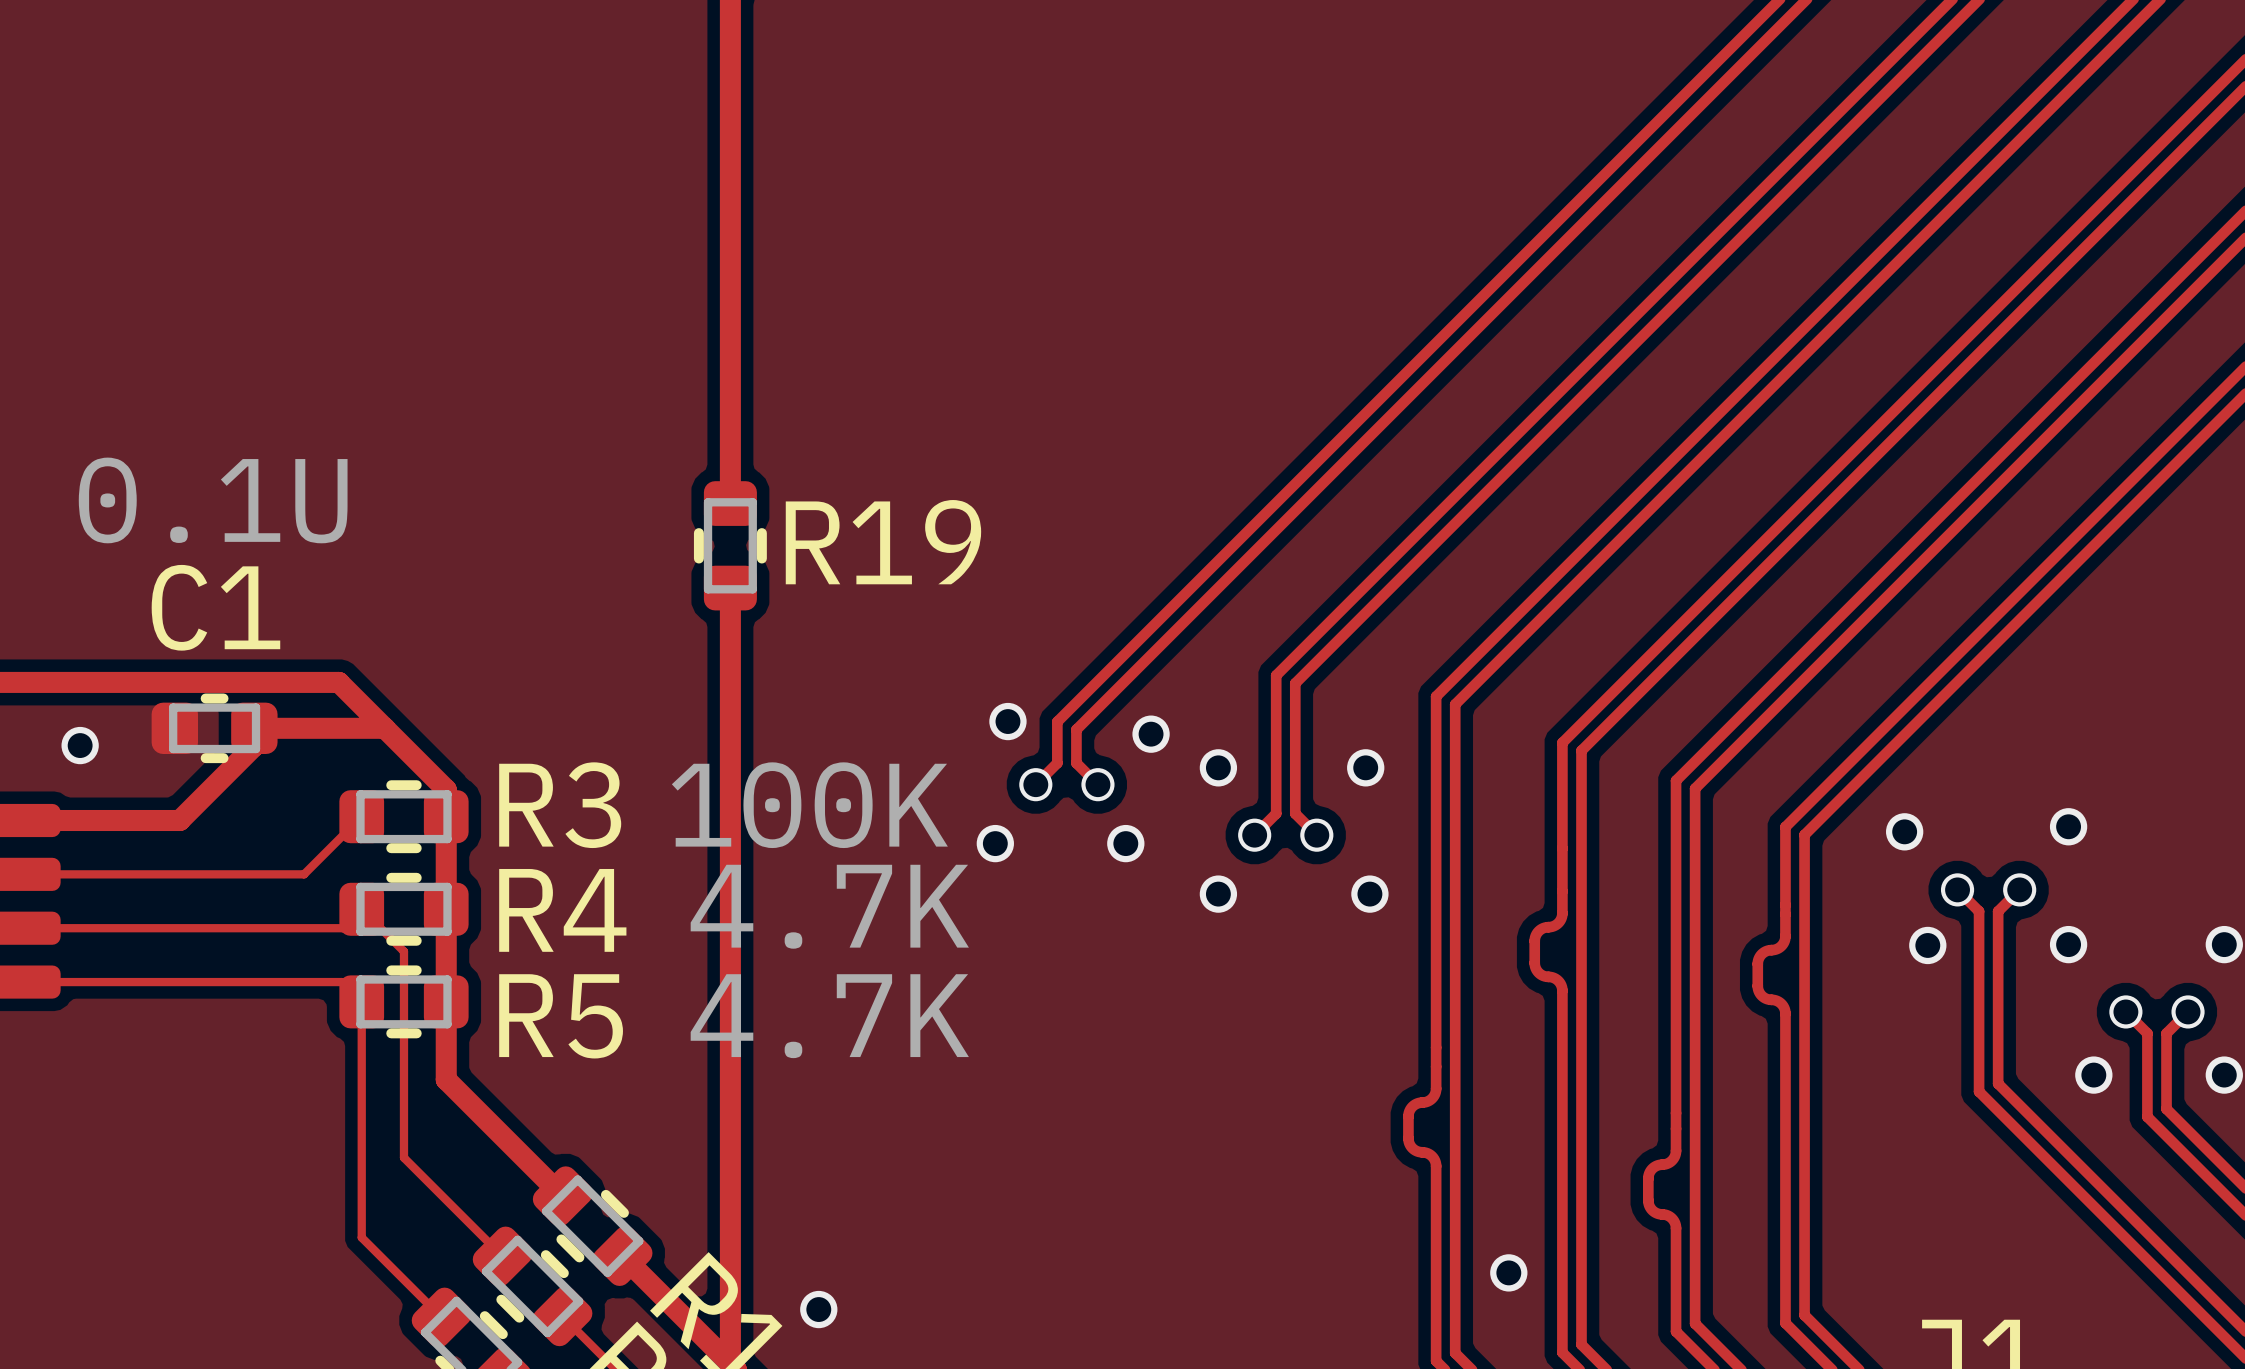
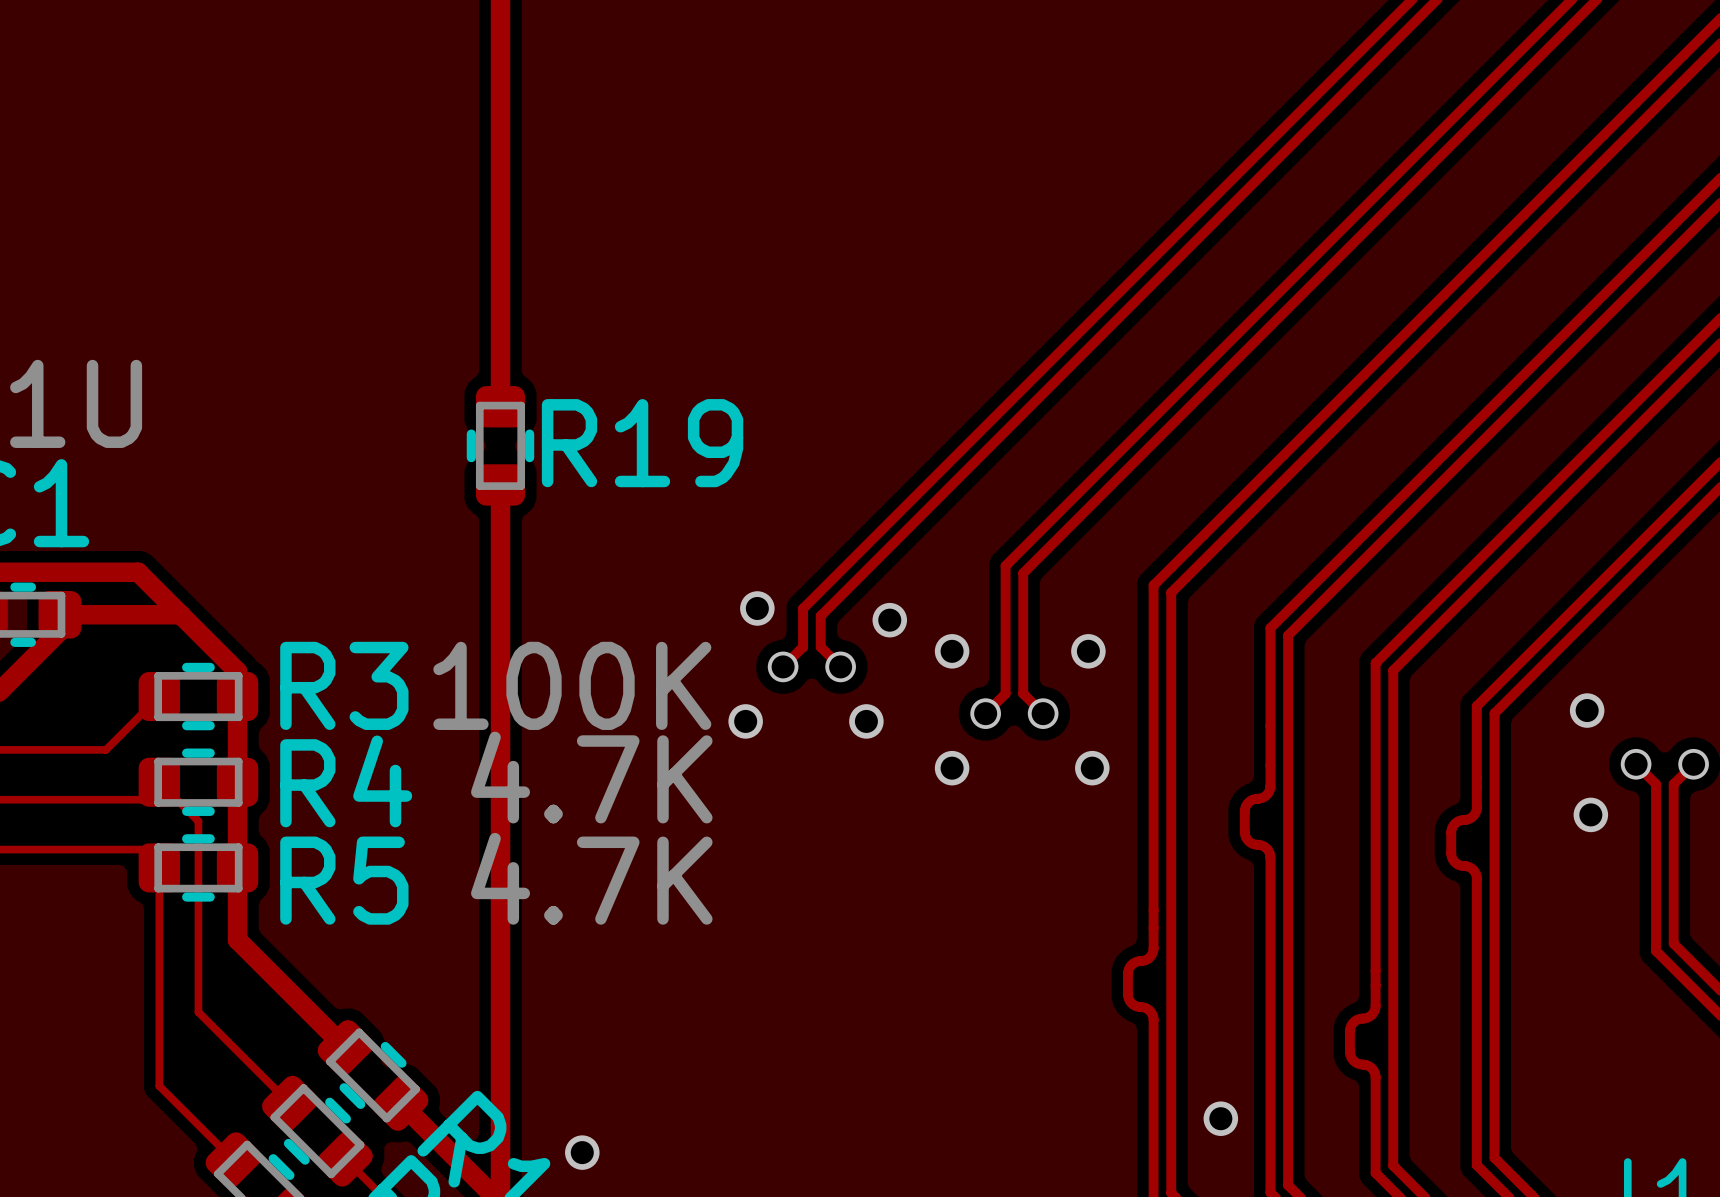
via position: (1927, 945) -> (1590, 814)

